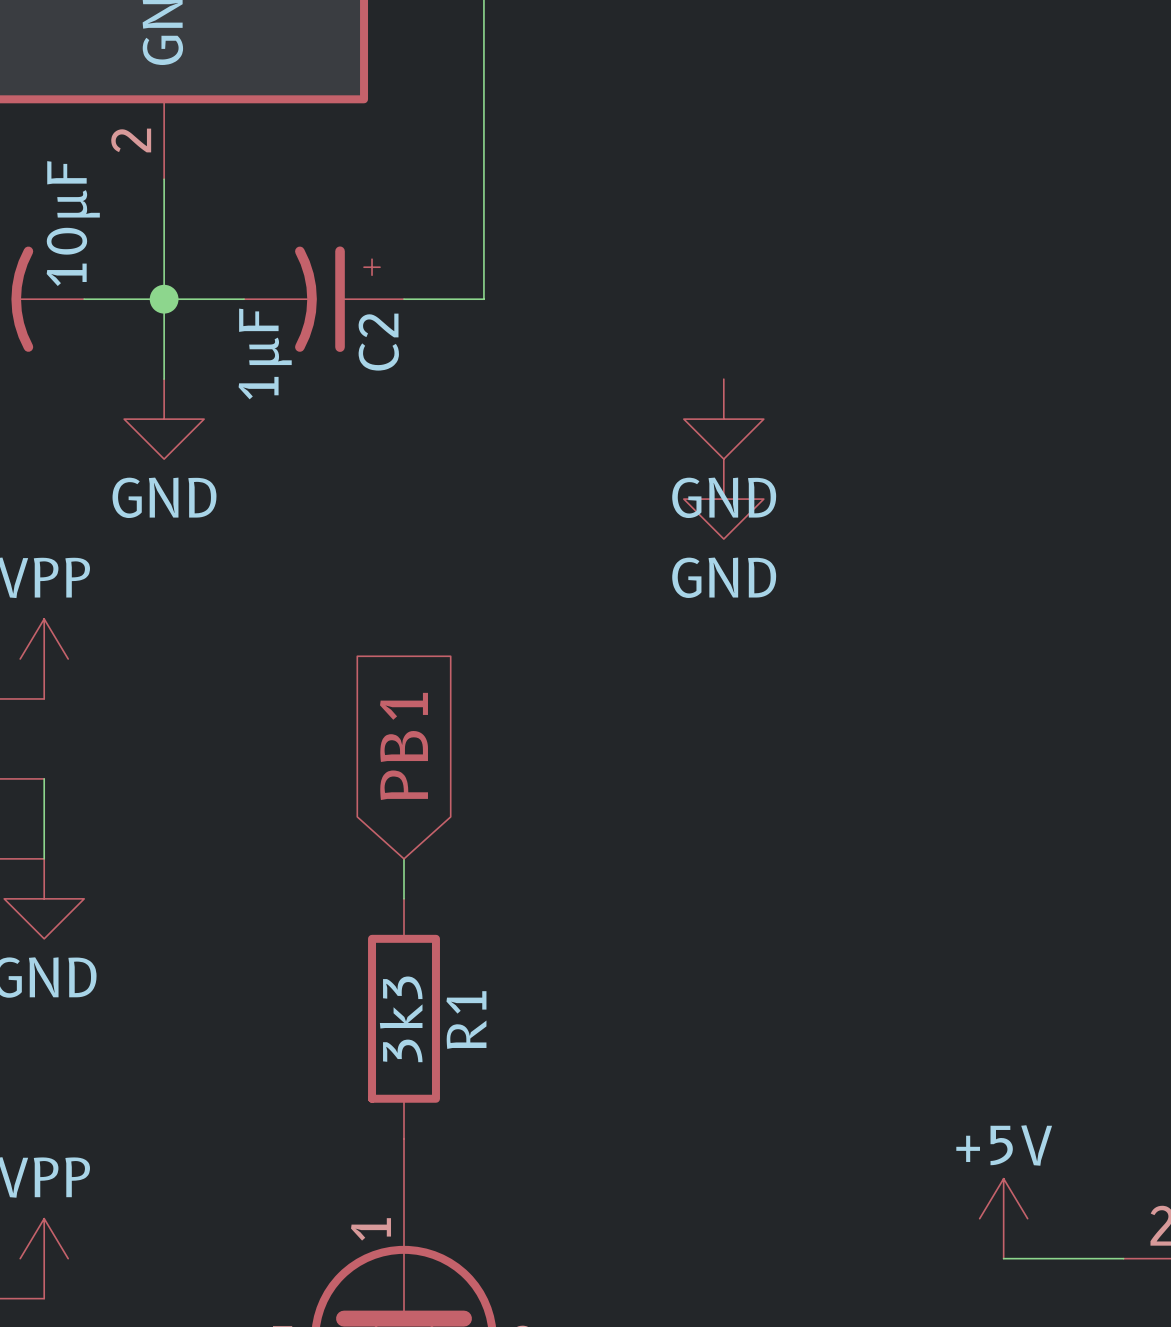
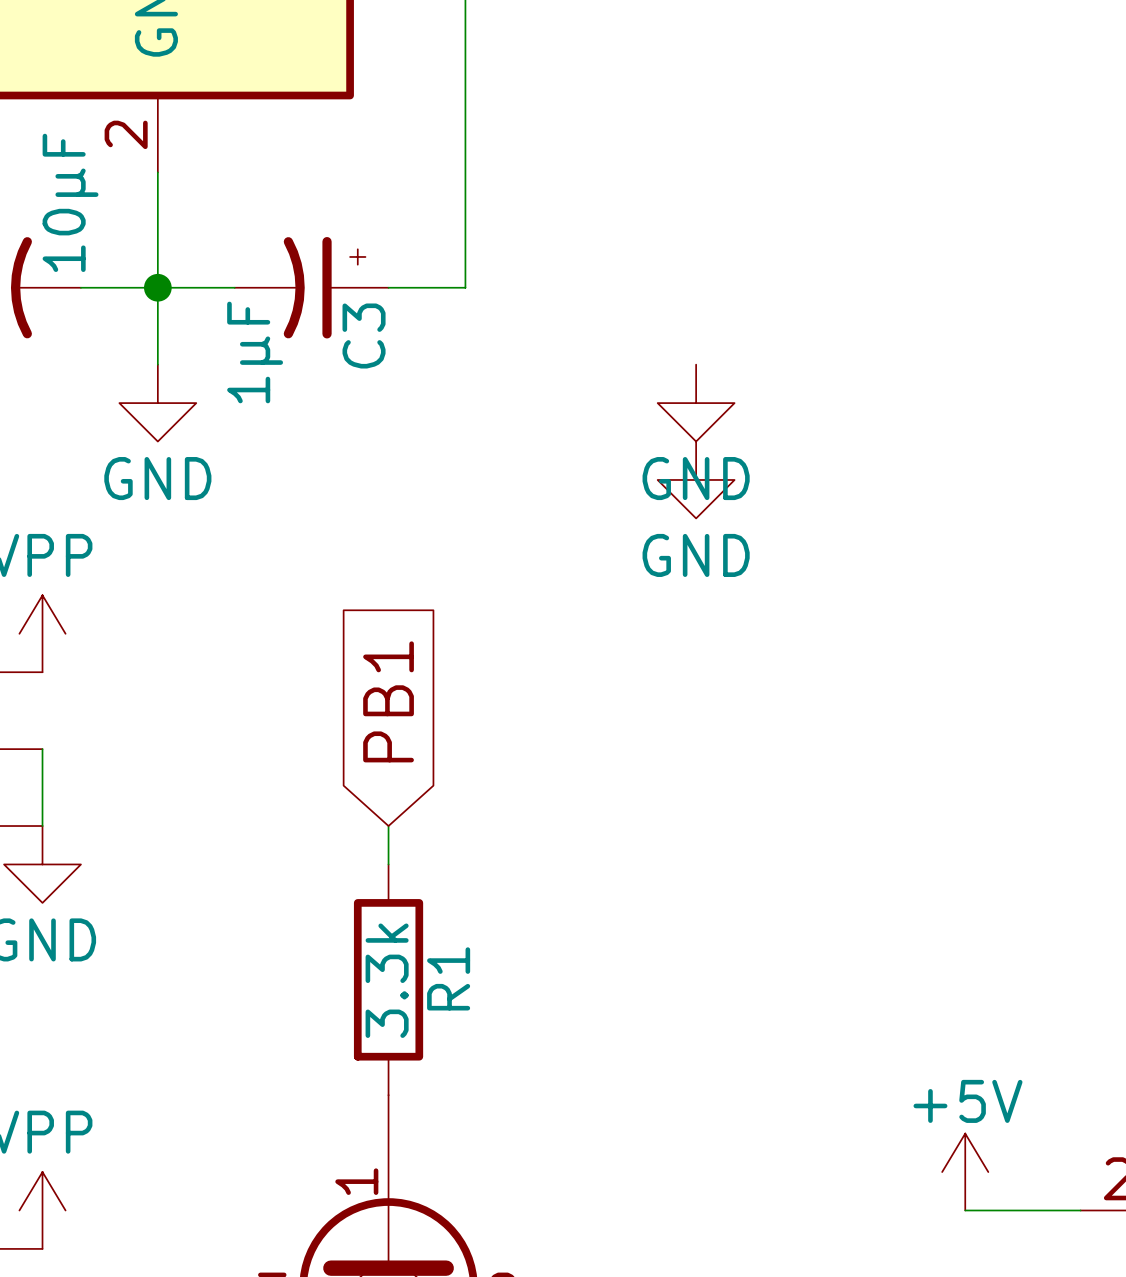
C2 name: C2 (378, 342) -> C3 (364, 336)
R1 value: 3k3 (401, 1019) -> 3.3k (387, 980)

